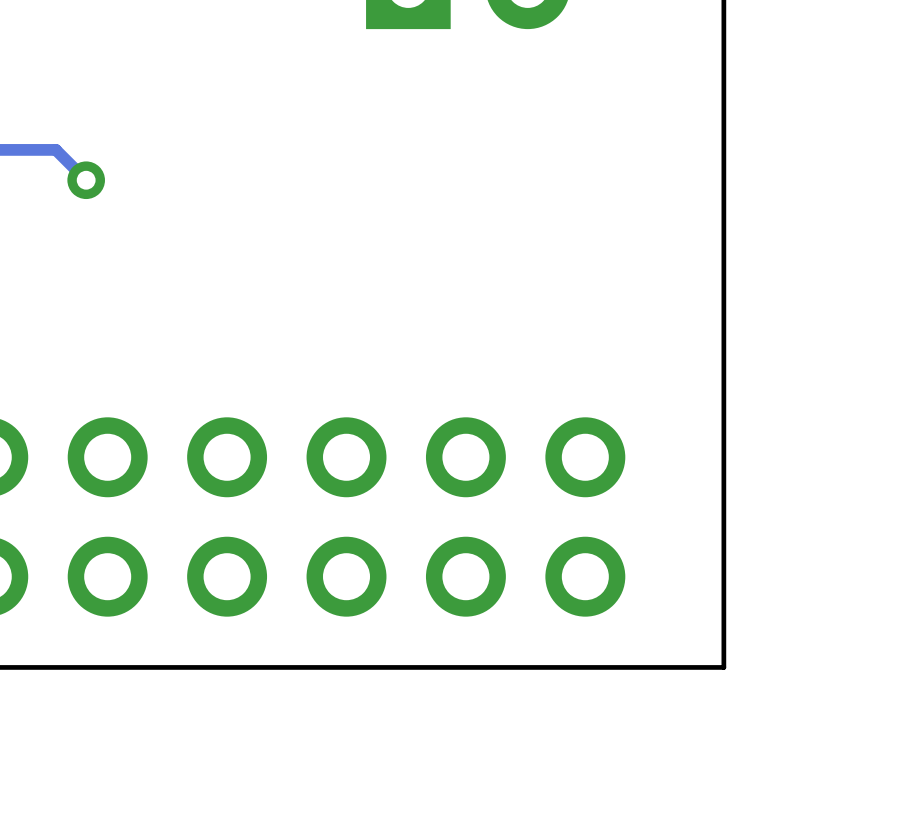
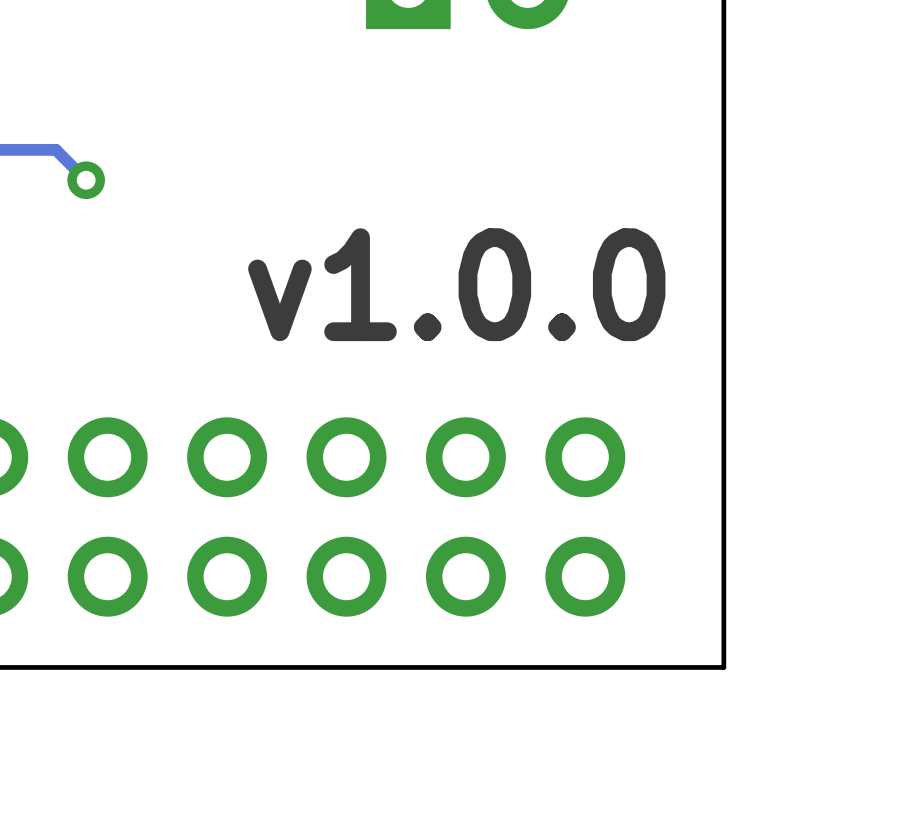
text: none -> v1.0.0 (456, 284)

